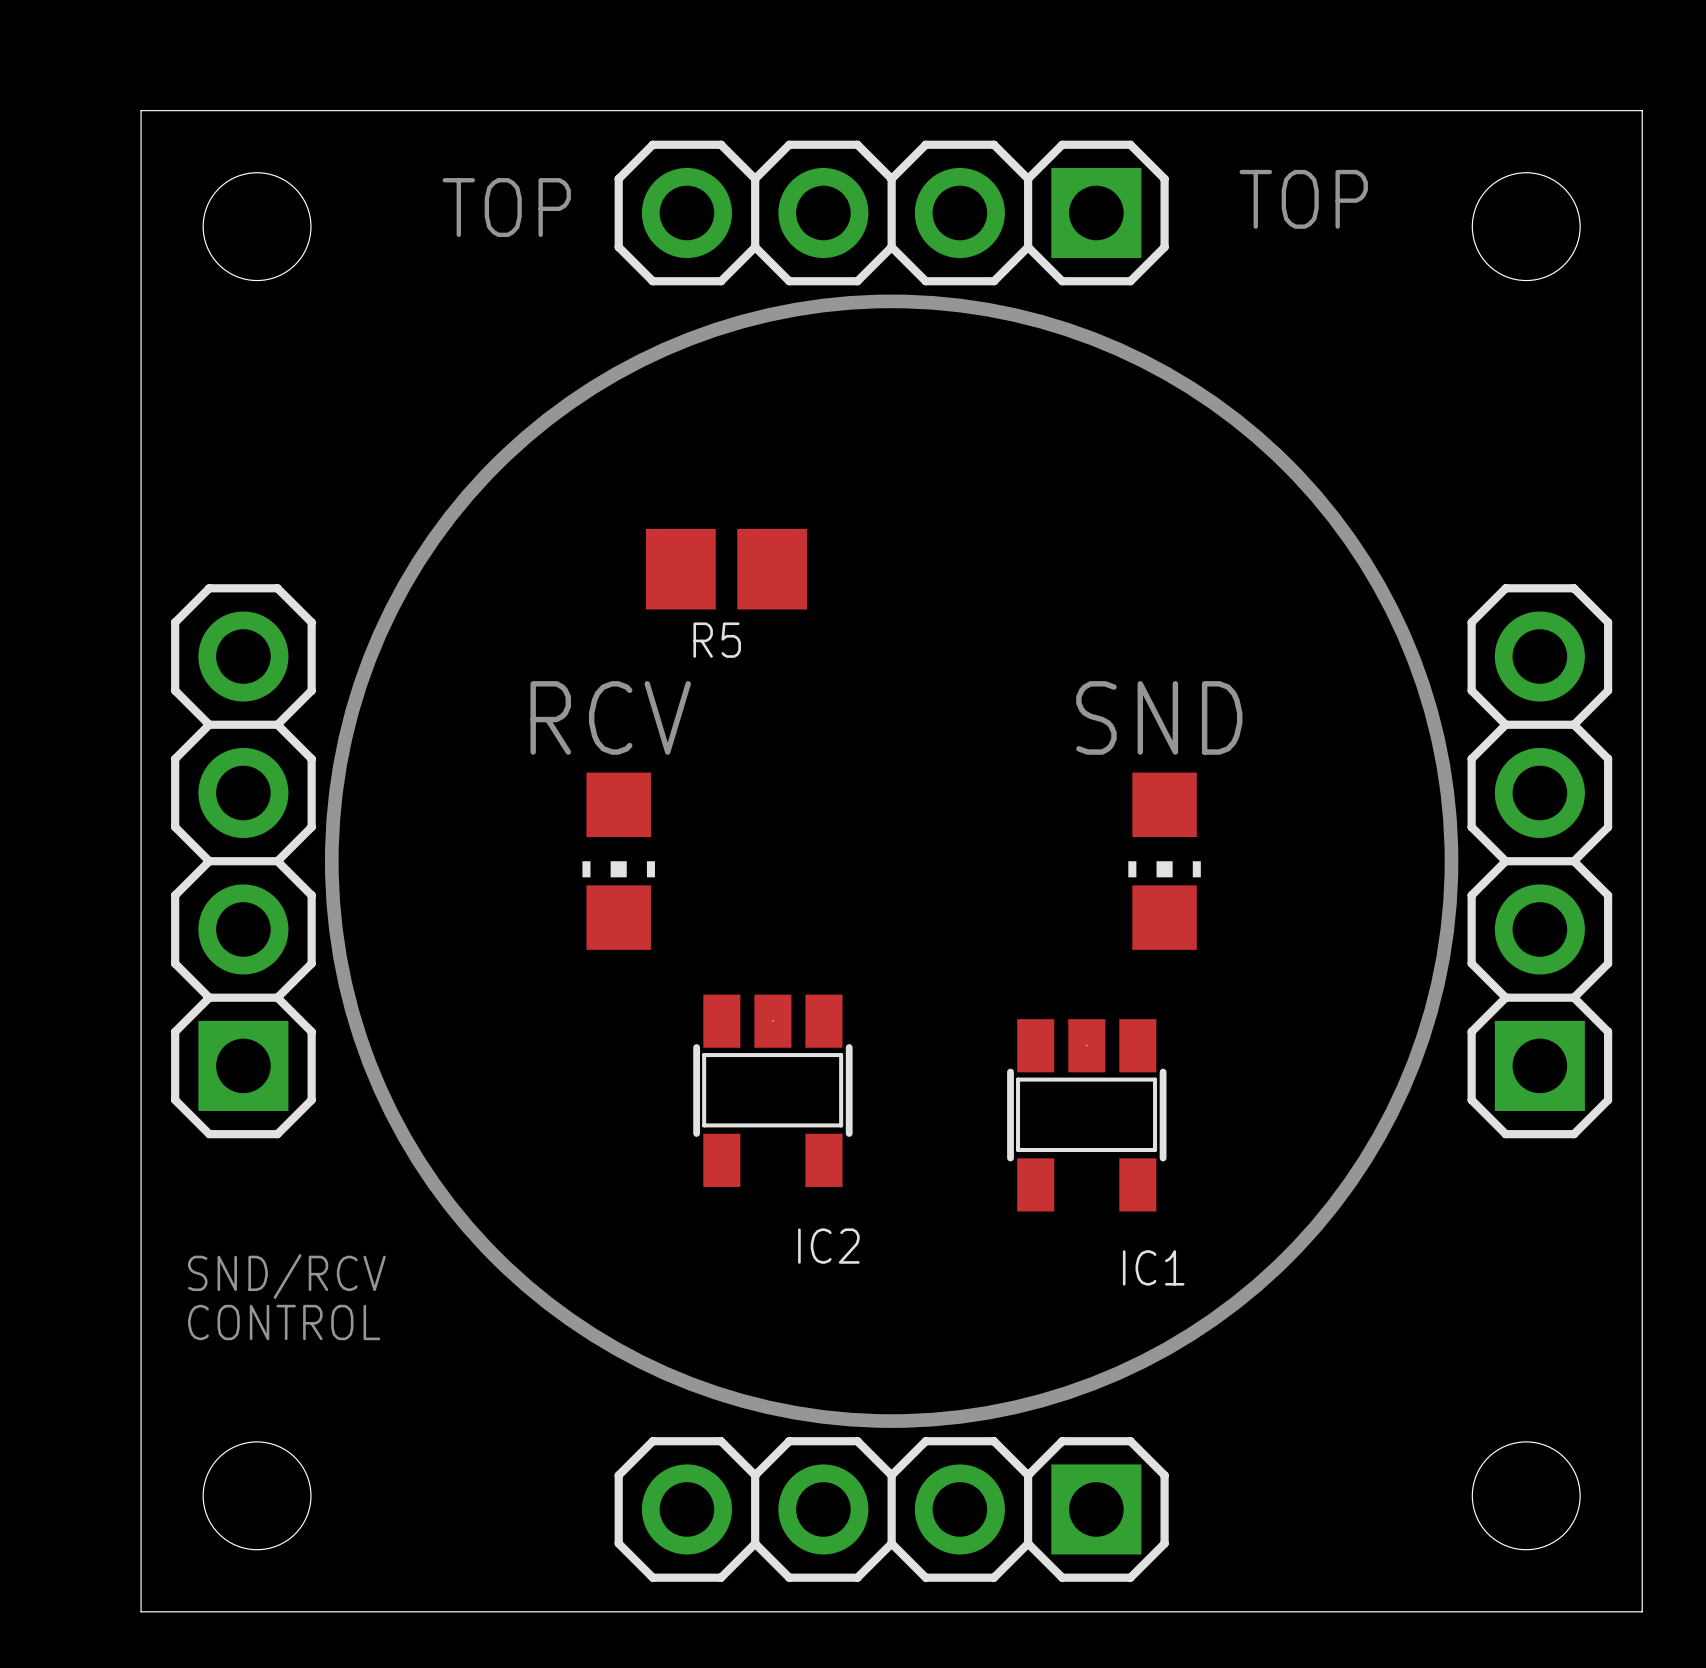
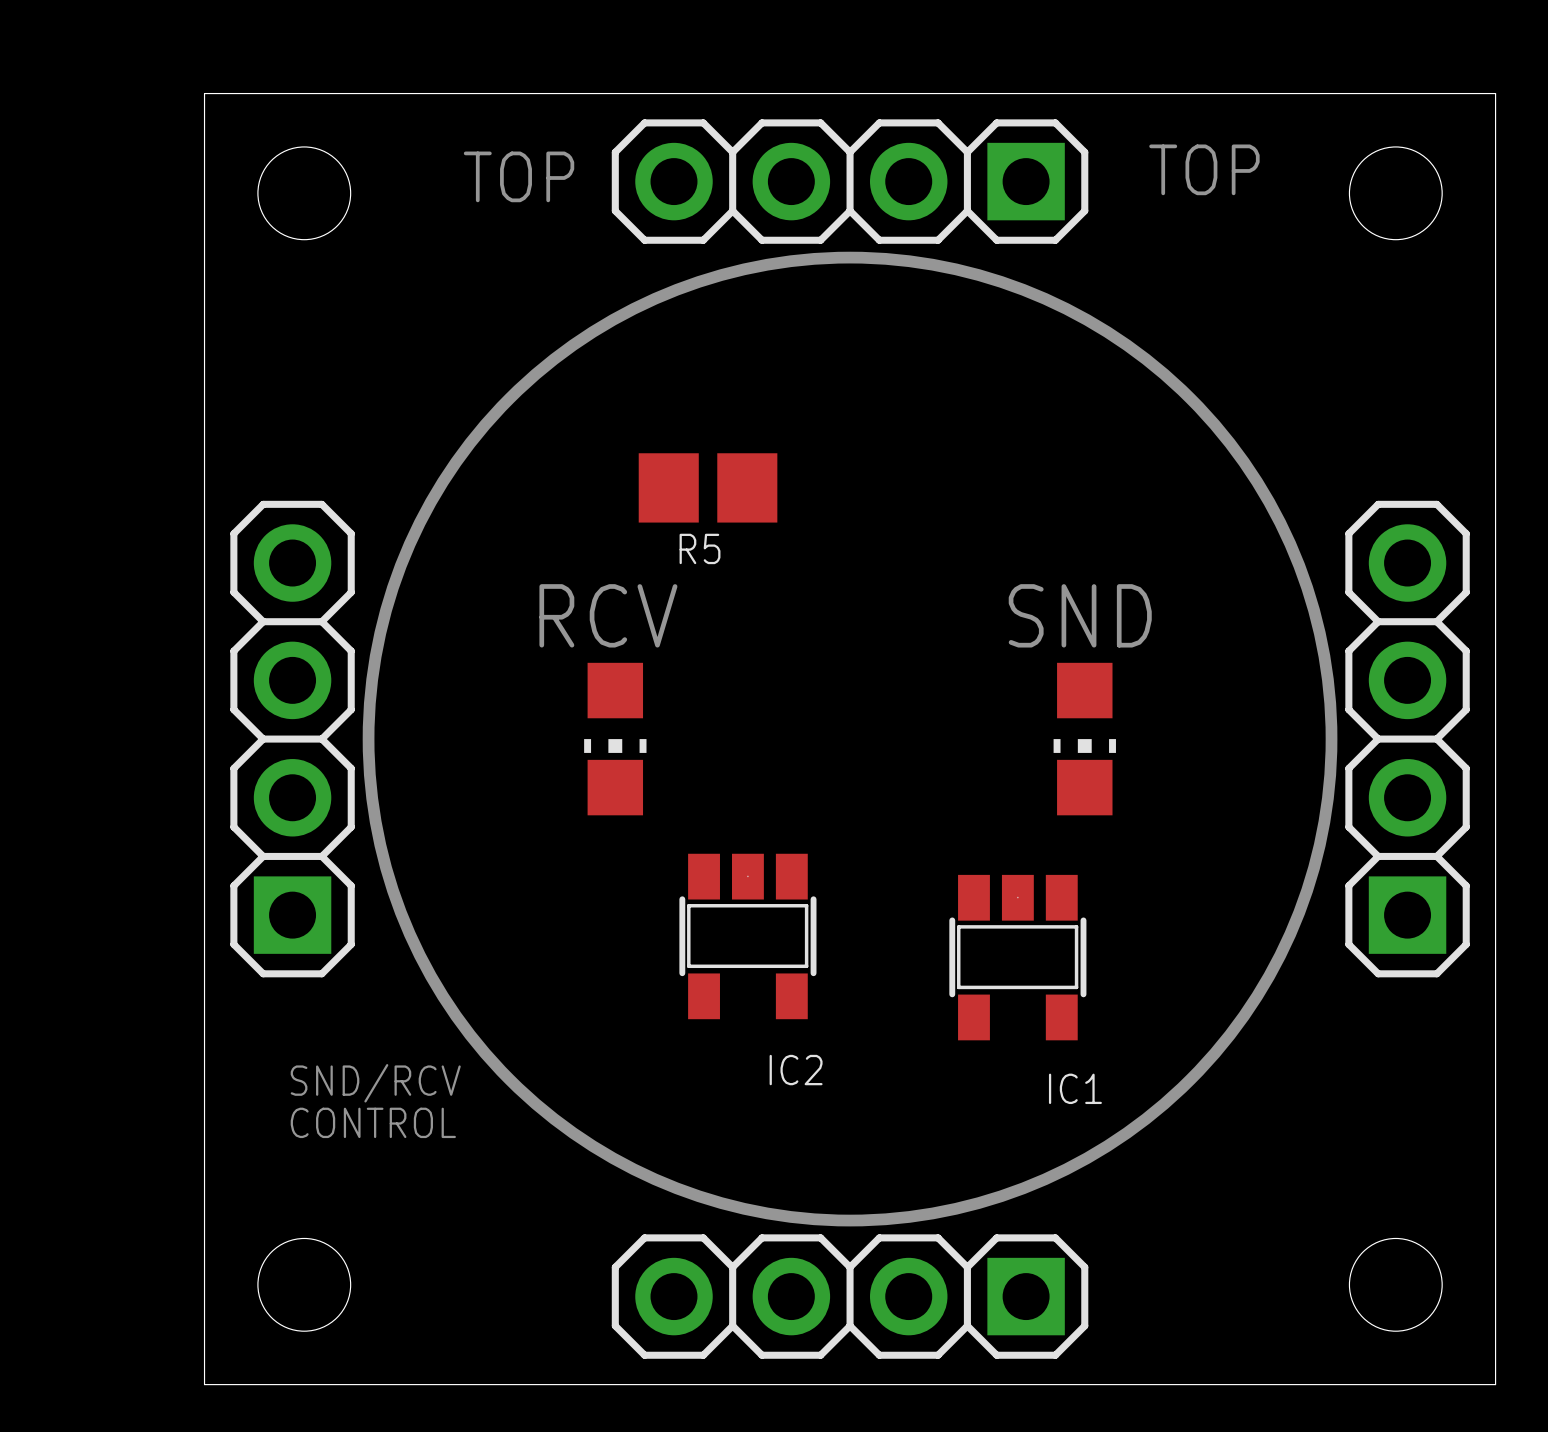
text position: SND/RCV (286, 1276) -> SND/RCV (375, 1083)
text position: CONTROL (284, 1322) -> CONTROL (373, 1122)

